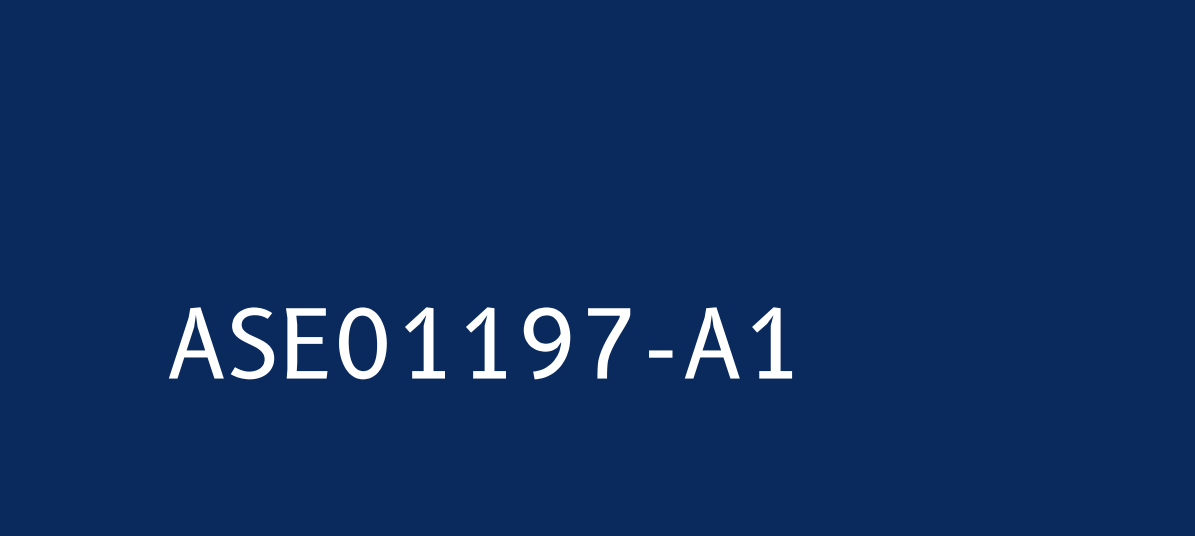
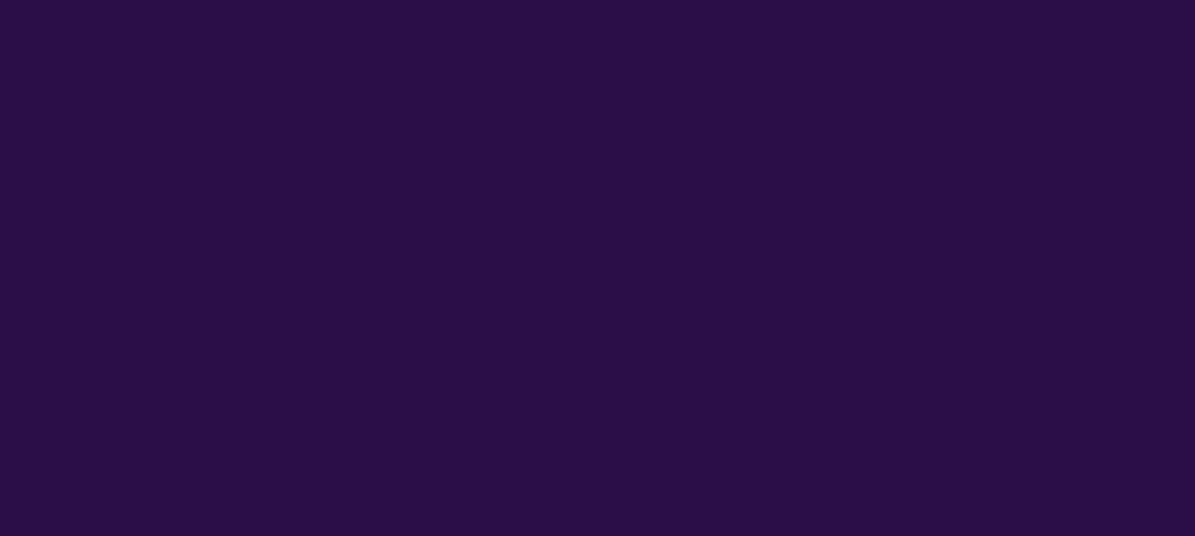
text: ASE01197-A1 (480, 343) -> none

